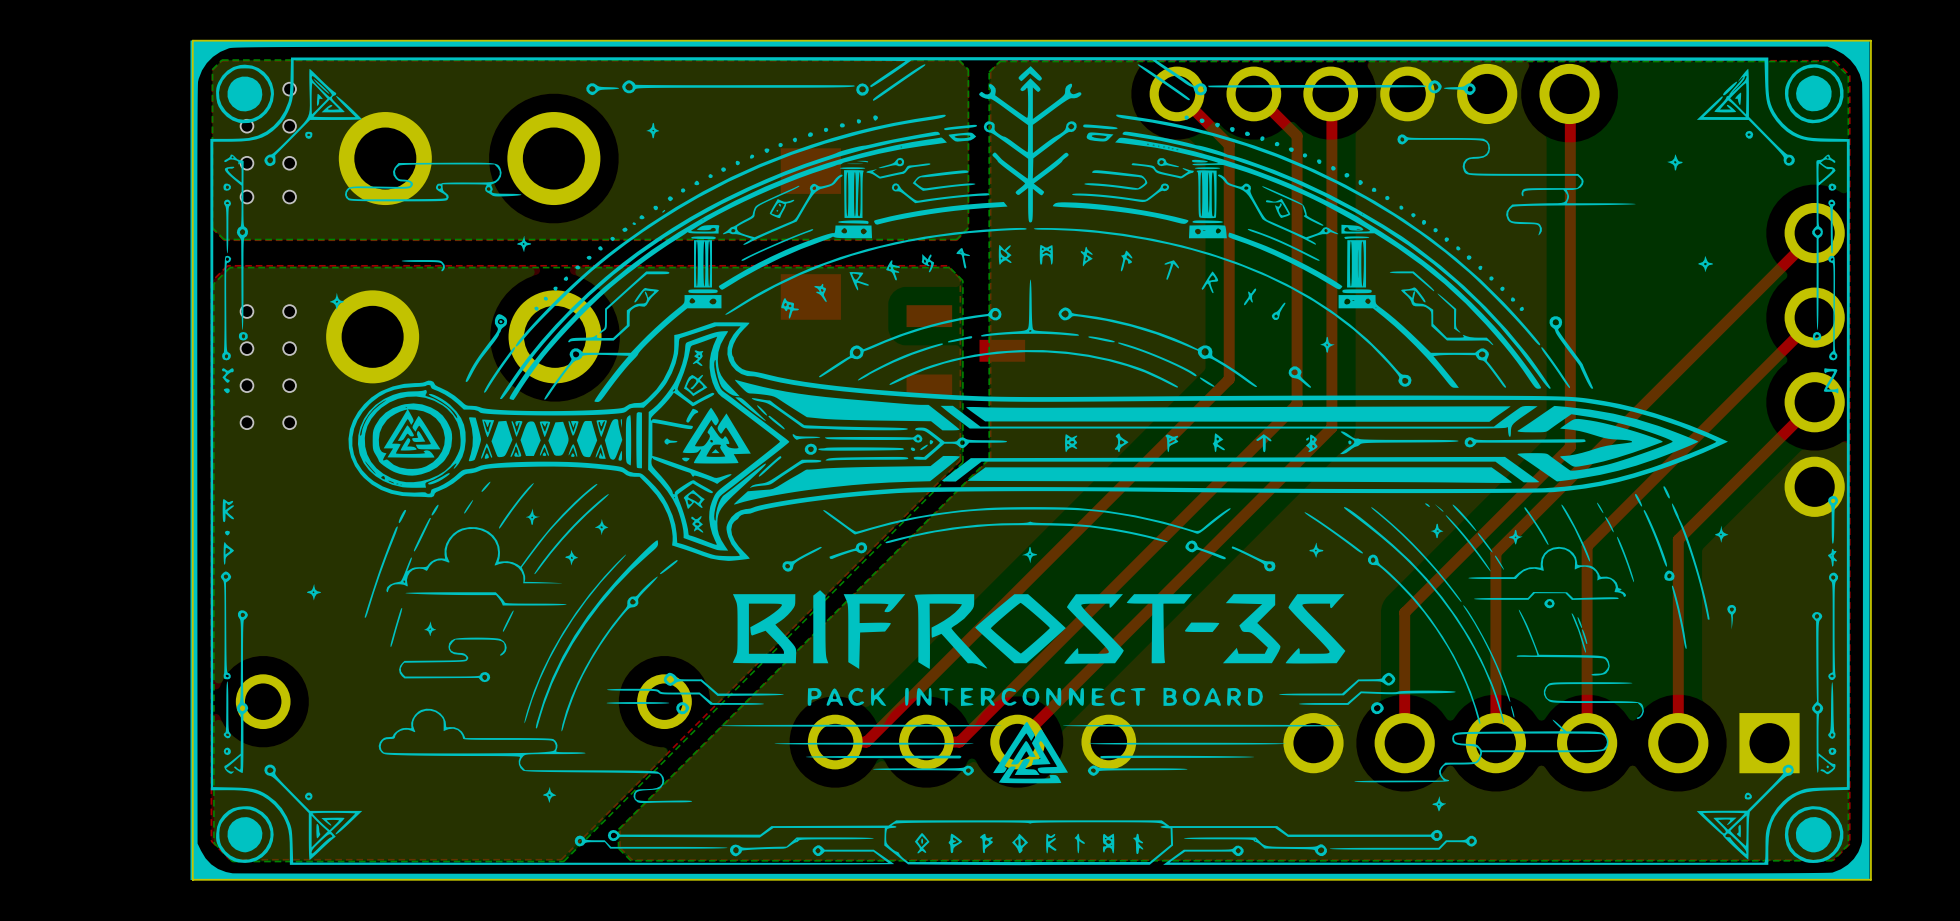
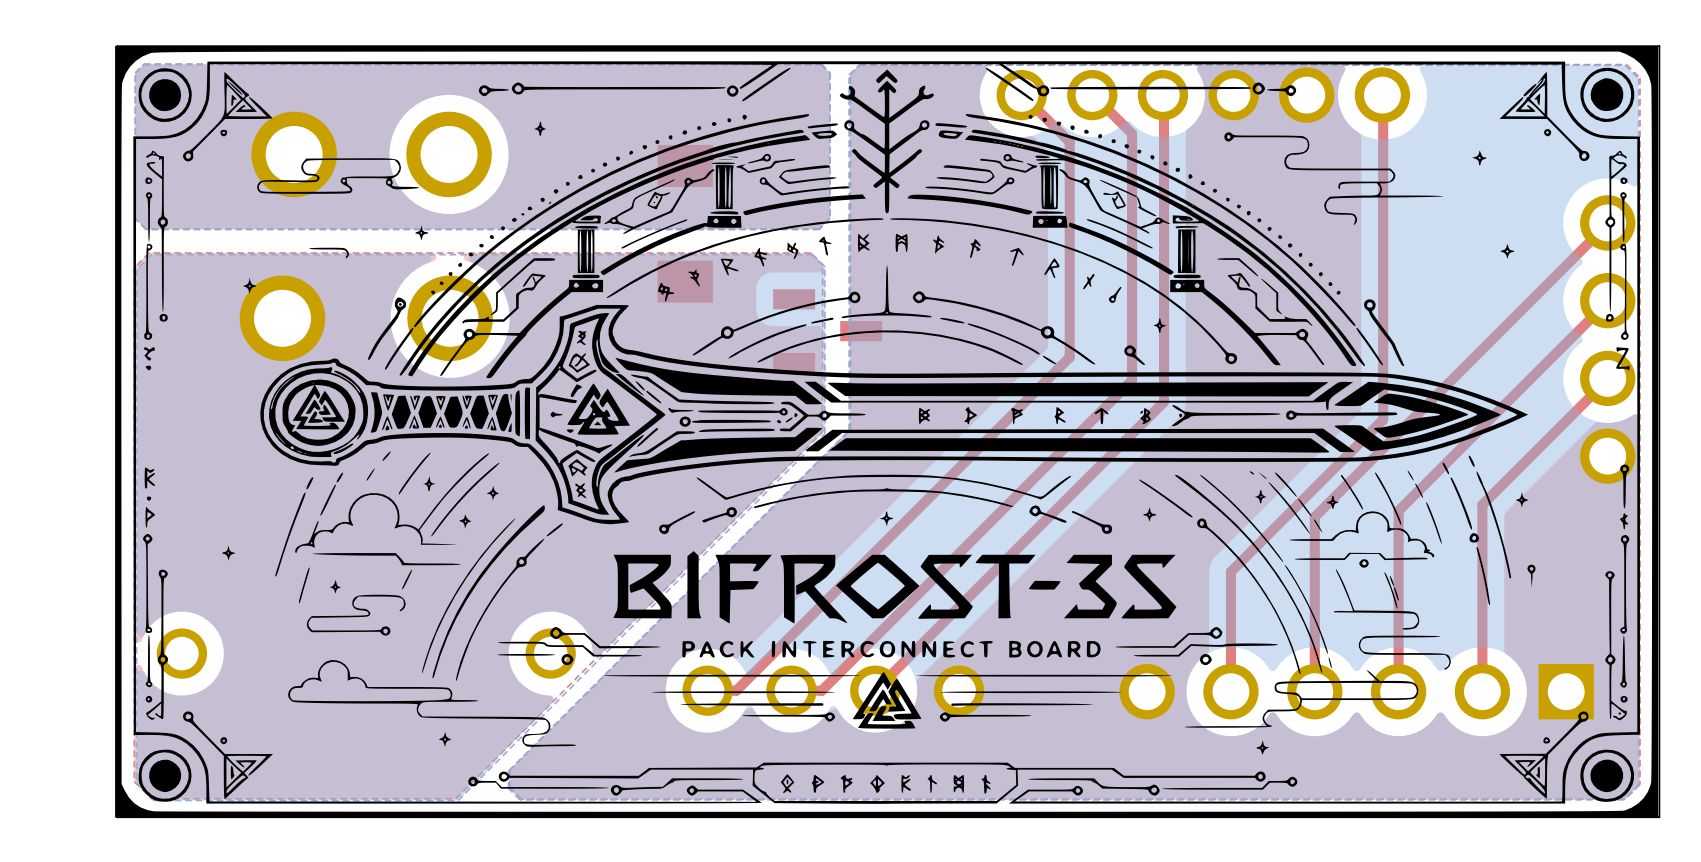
via: (289, 89) -> none
via: (246, 126) -> none
via: (289, 126) -> none
via: (246, 163) -> none
via: (289, 163) -> none
via: (246, 197) -> none
via: (289, 197) -> none
via: (246, 311) -> none
via: (289, 311) -> none
via: (246, 348) -> none
via: (289, 348) -> none
via: (246, 385) -> none
via: (289, 385) -> none
via: (246, 422) -> none
via: (289, 422) -> none

